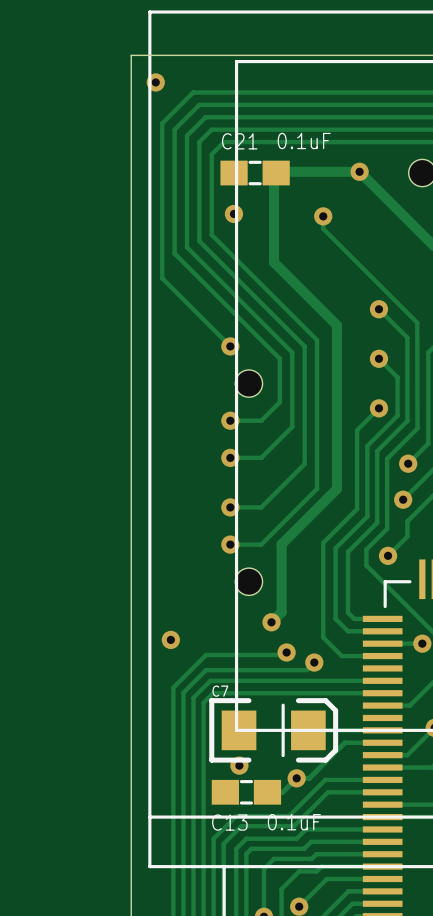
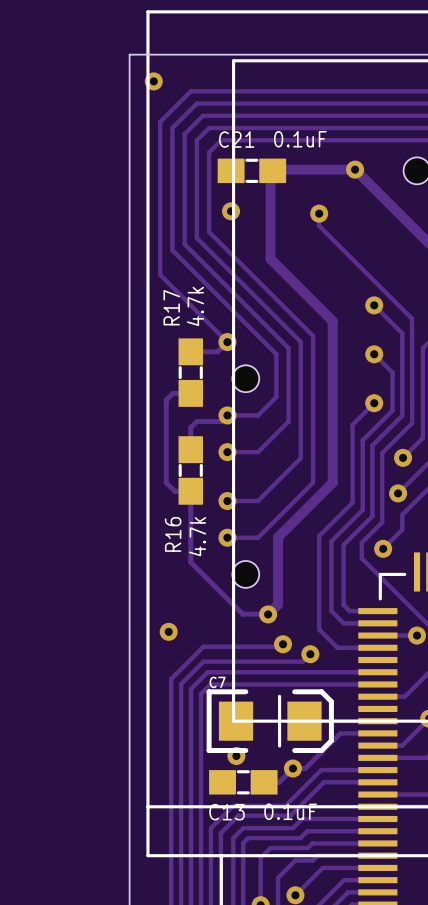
track: none -> (227, 342) (217, 351) (190, 351)
R17: none -> 4.7k (190, 372)
track: none -> (190, 393) (173, 393) (166, 400) (166, 482) (174, 491) (190, 491) (190, 562) (242, 614) (267, 614)
track: none -> (227, 415) (221, 421) (196, 421) (190, 427) (190, 449)
R16: none -> 4.7k (190, 470)

